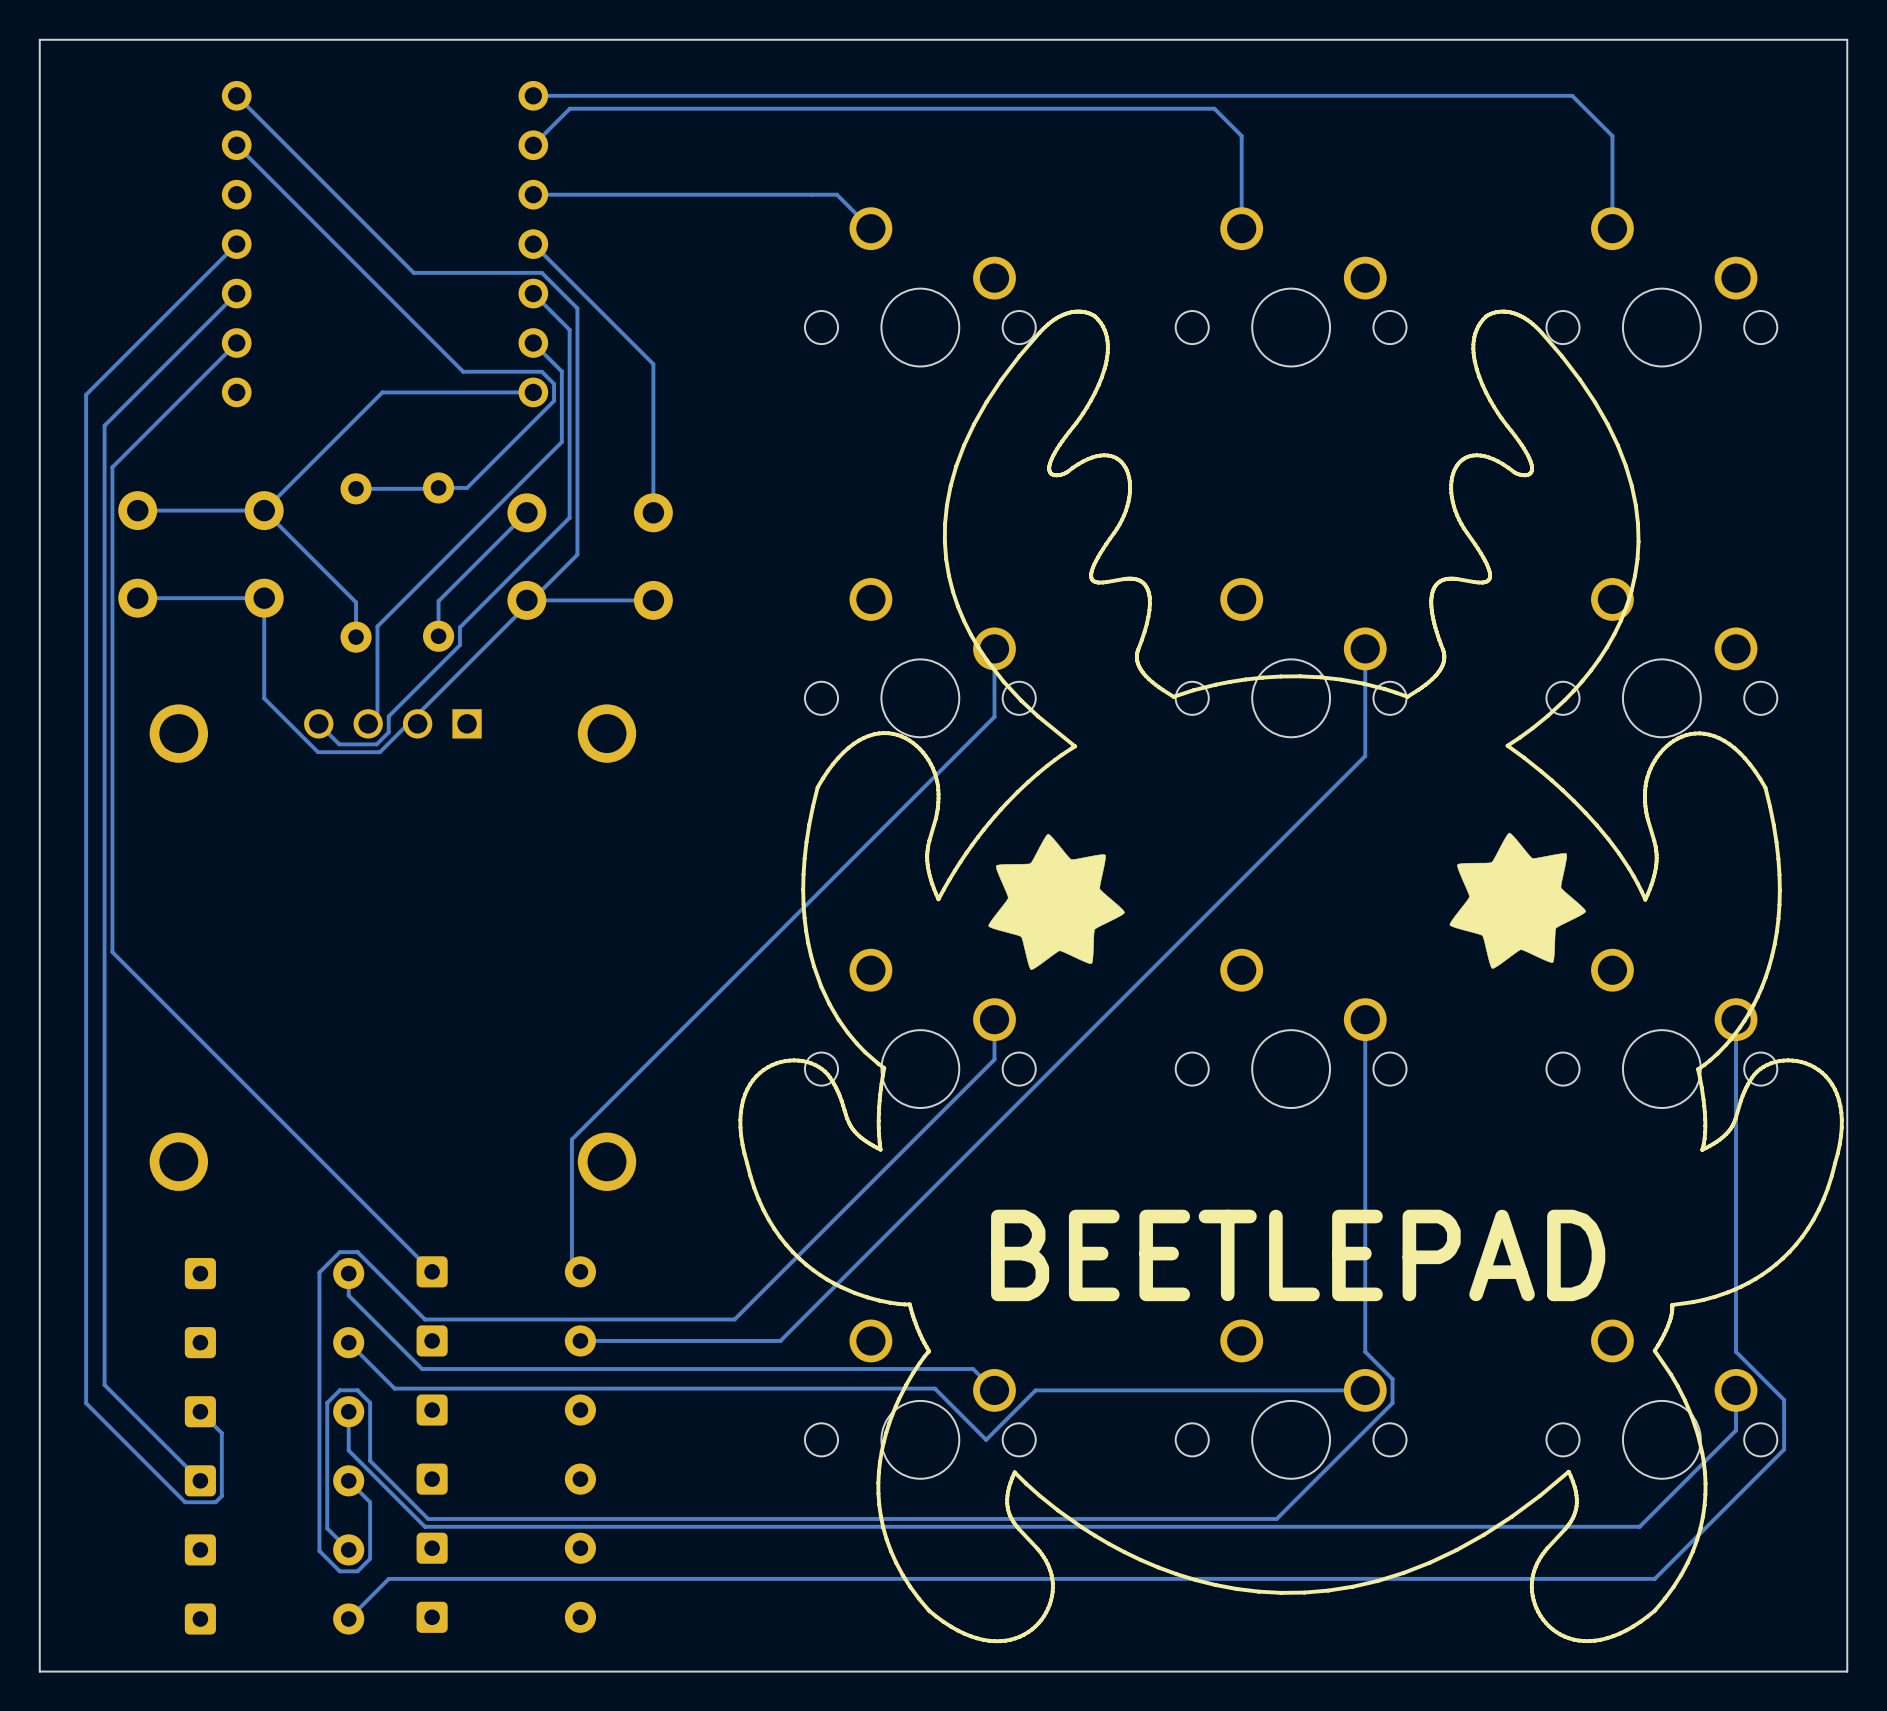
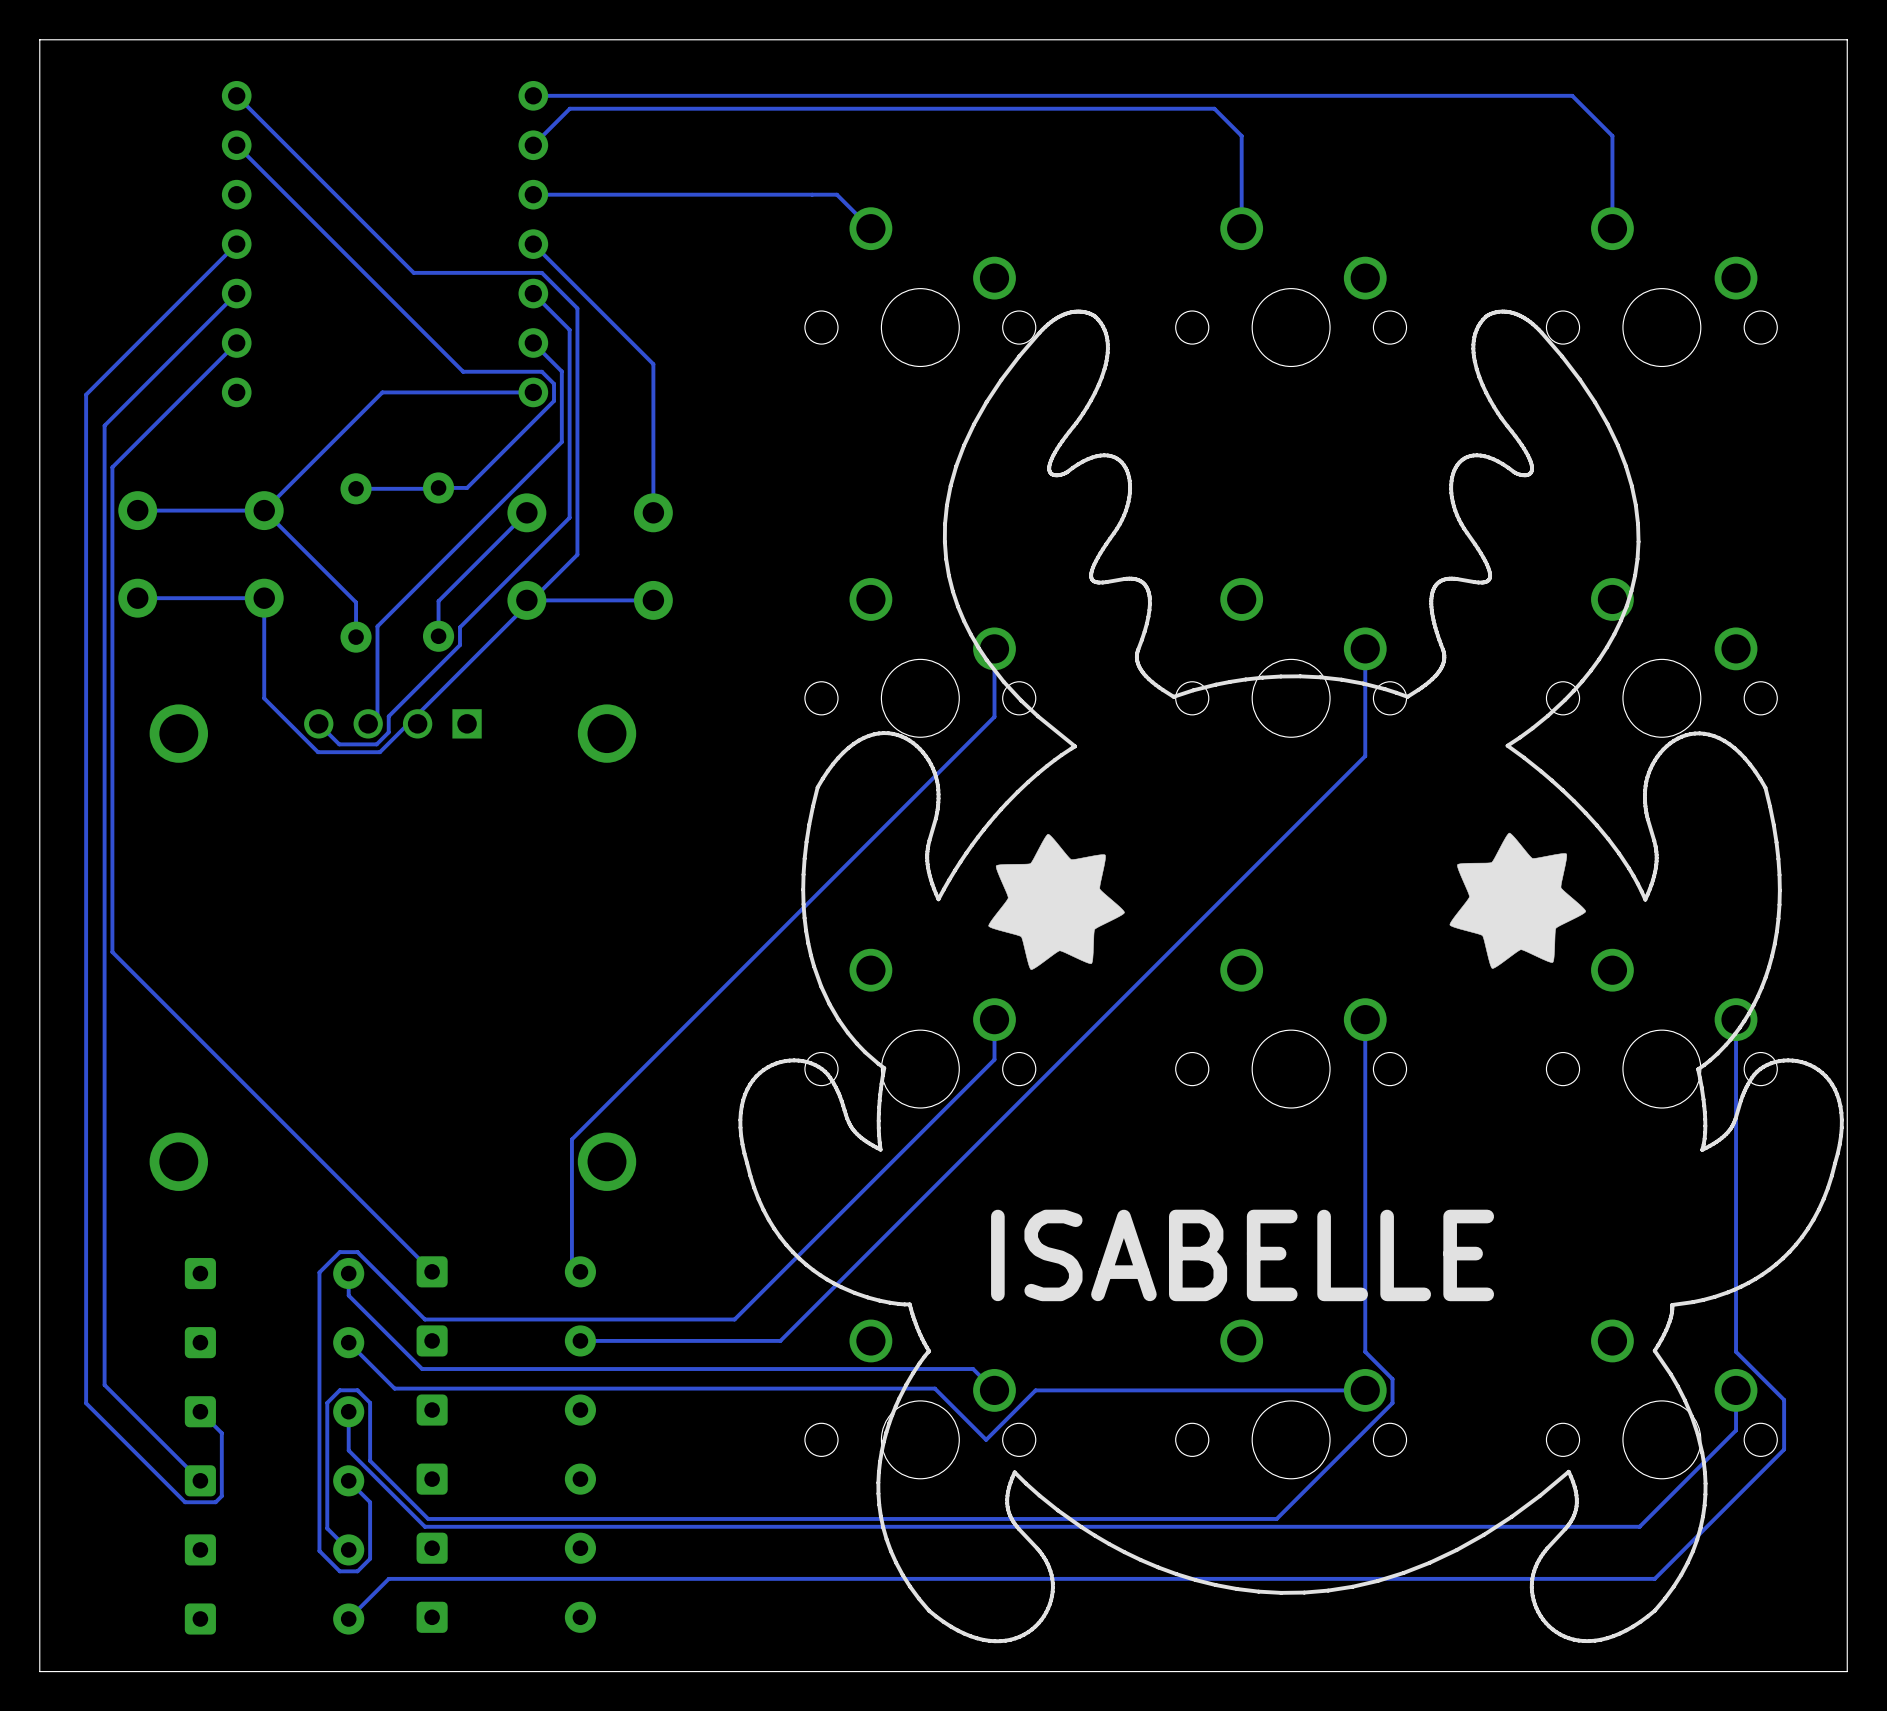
text: BEETLEPAD (1298, 1255) -> ISABELLE (1242, 1255)

